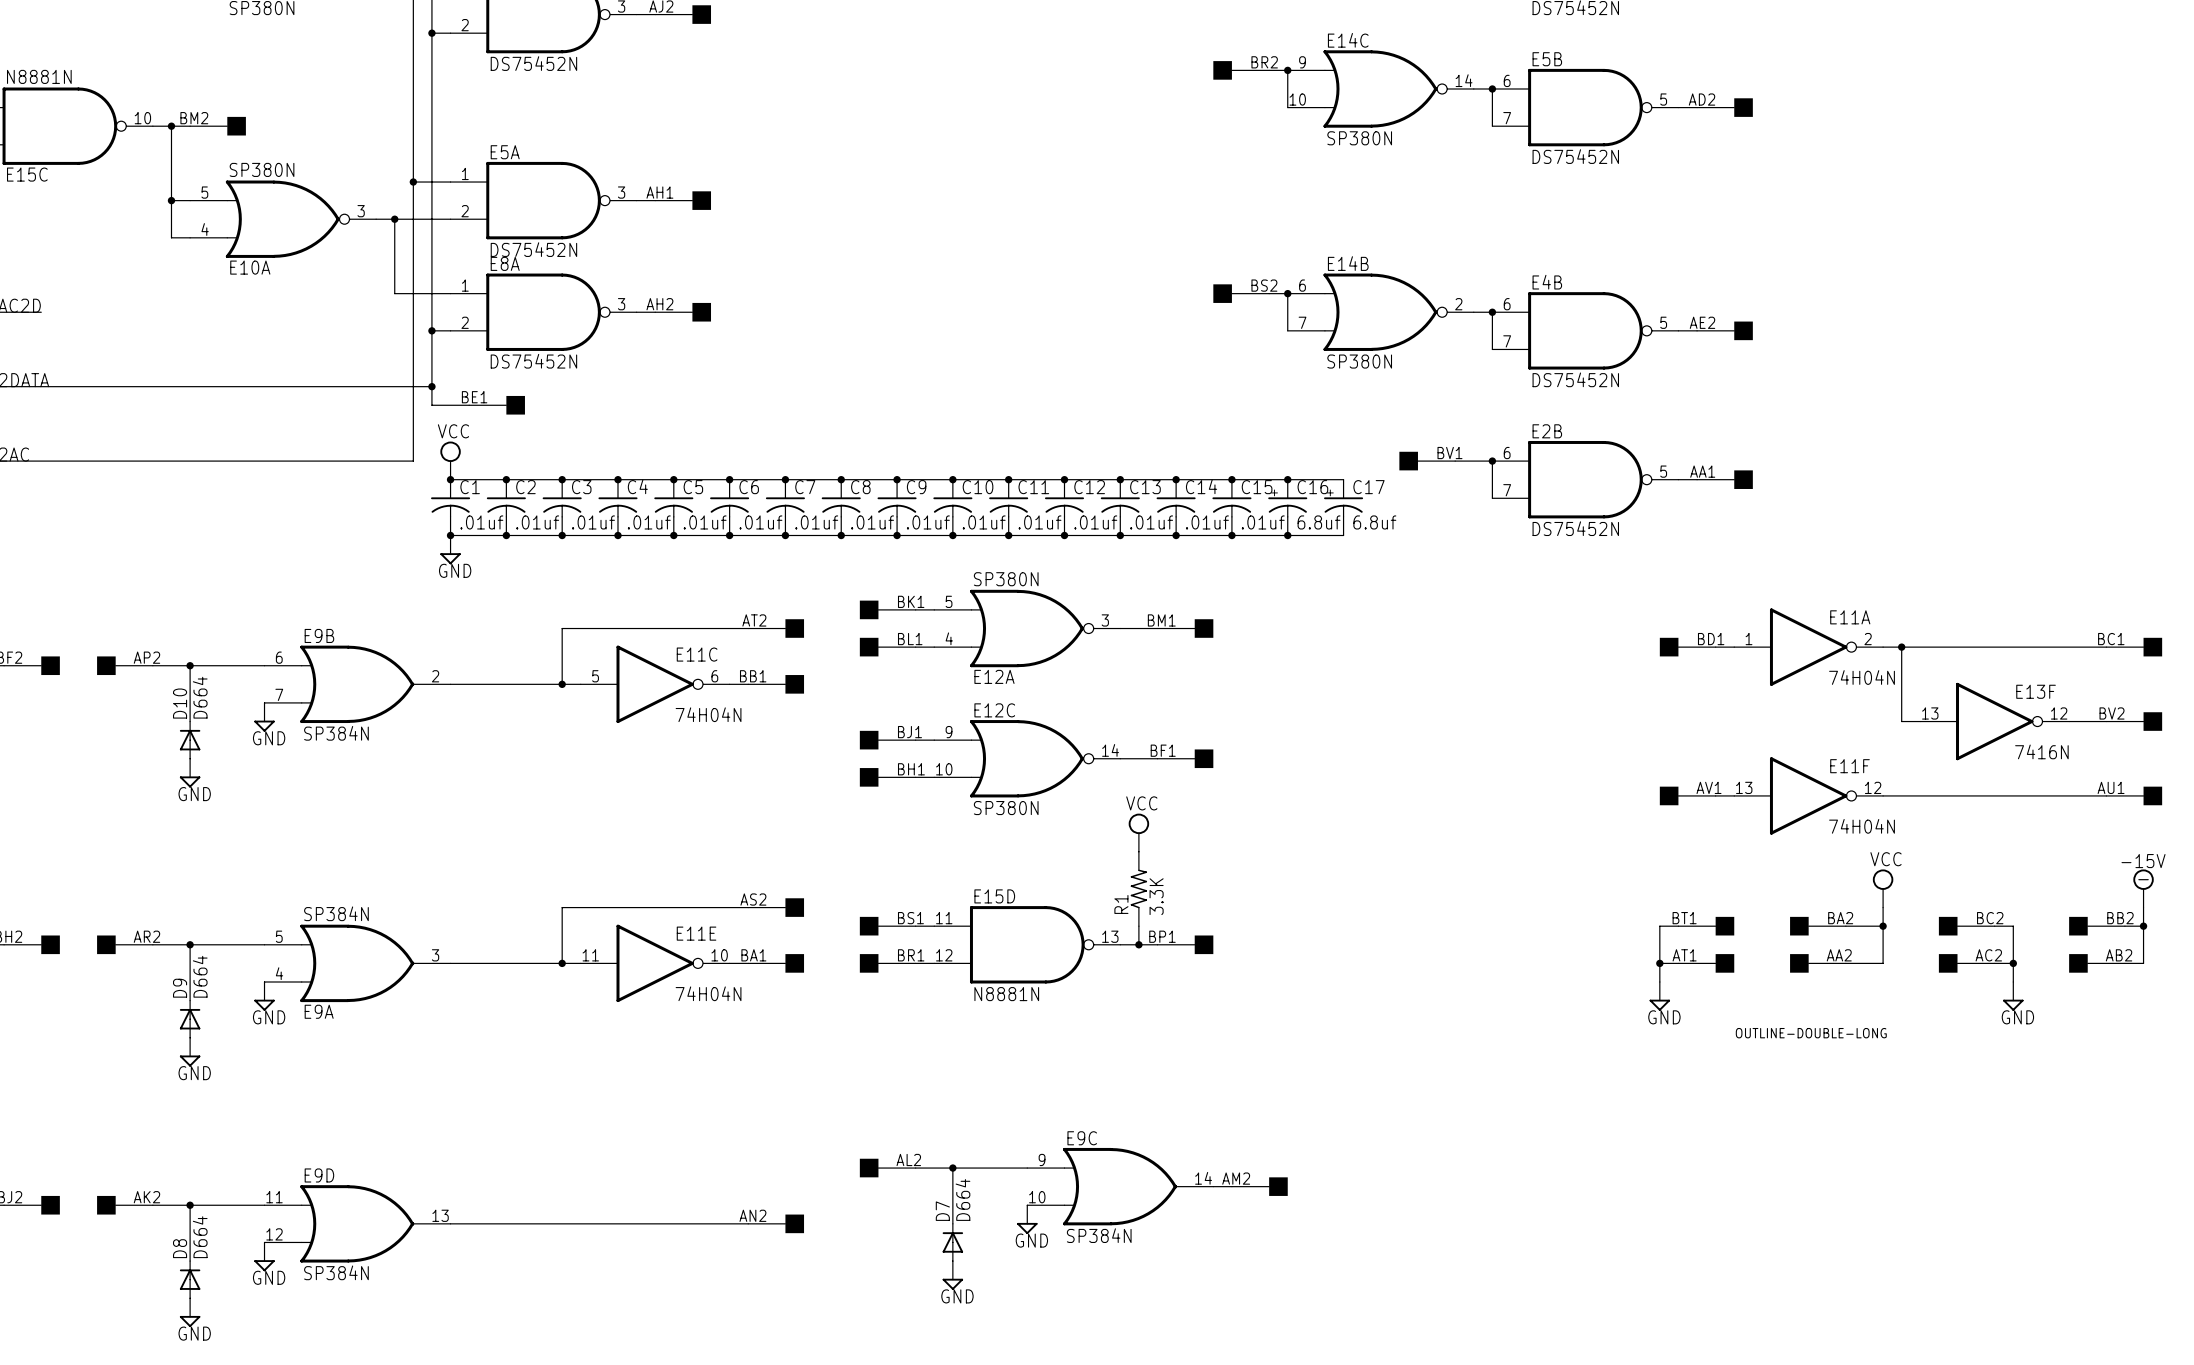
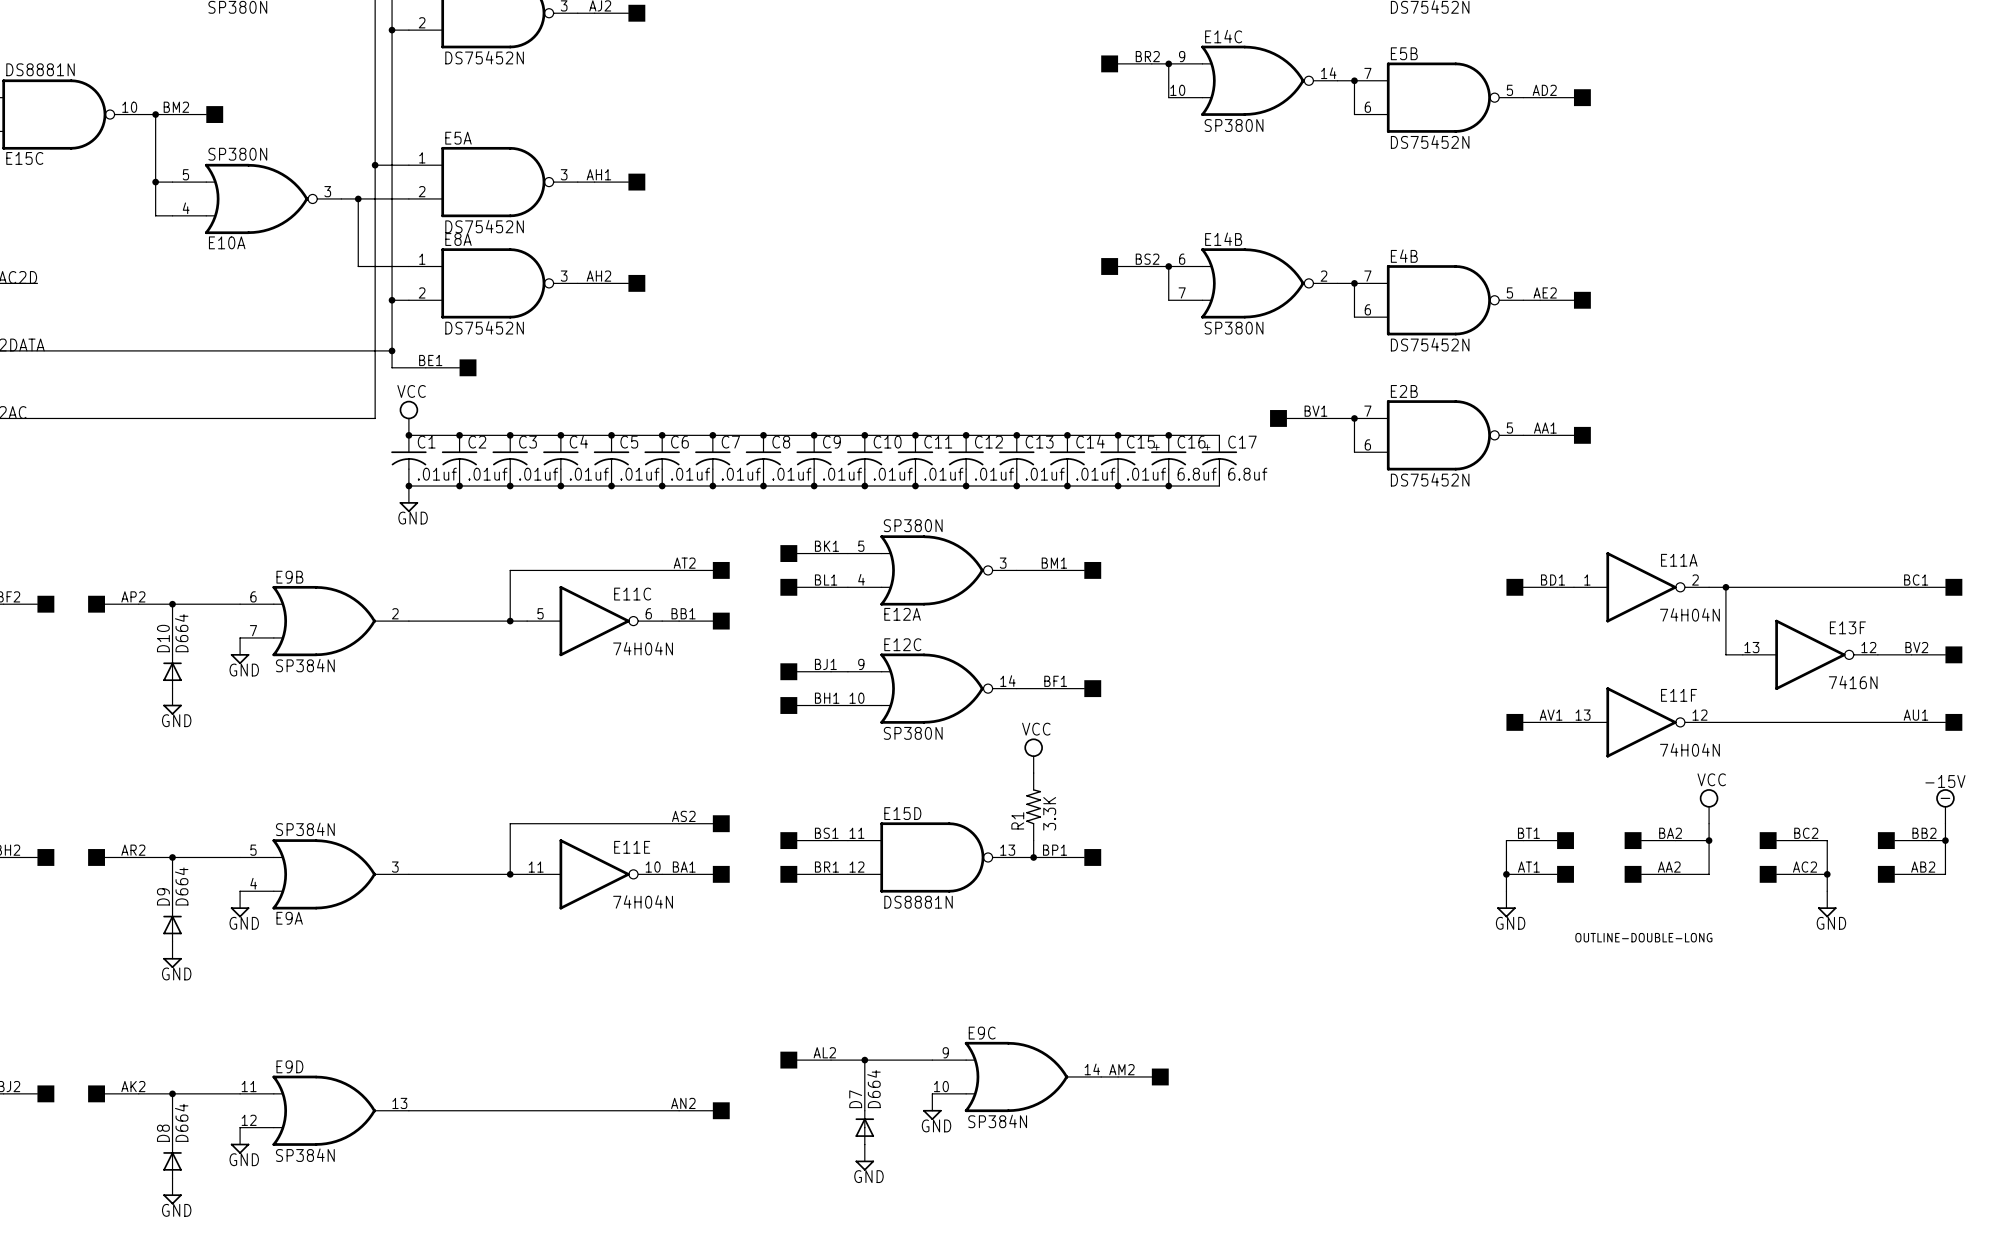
E15C value: N8881N (39, 76) -> DS8881N (40, 69)
E5B flip: as is (1585, 107) -> up-down (1438, 97)
E4B flip: as is (1585, 330) -> up-down (1438, 300)
E2B flip: as is (1585, 479) -> up-down (1438, 435)
E15D value: N8881N (1006, 994) -> DS8881N (918, 902)

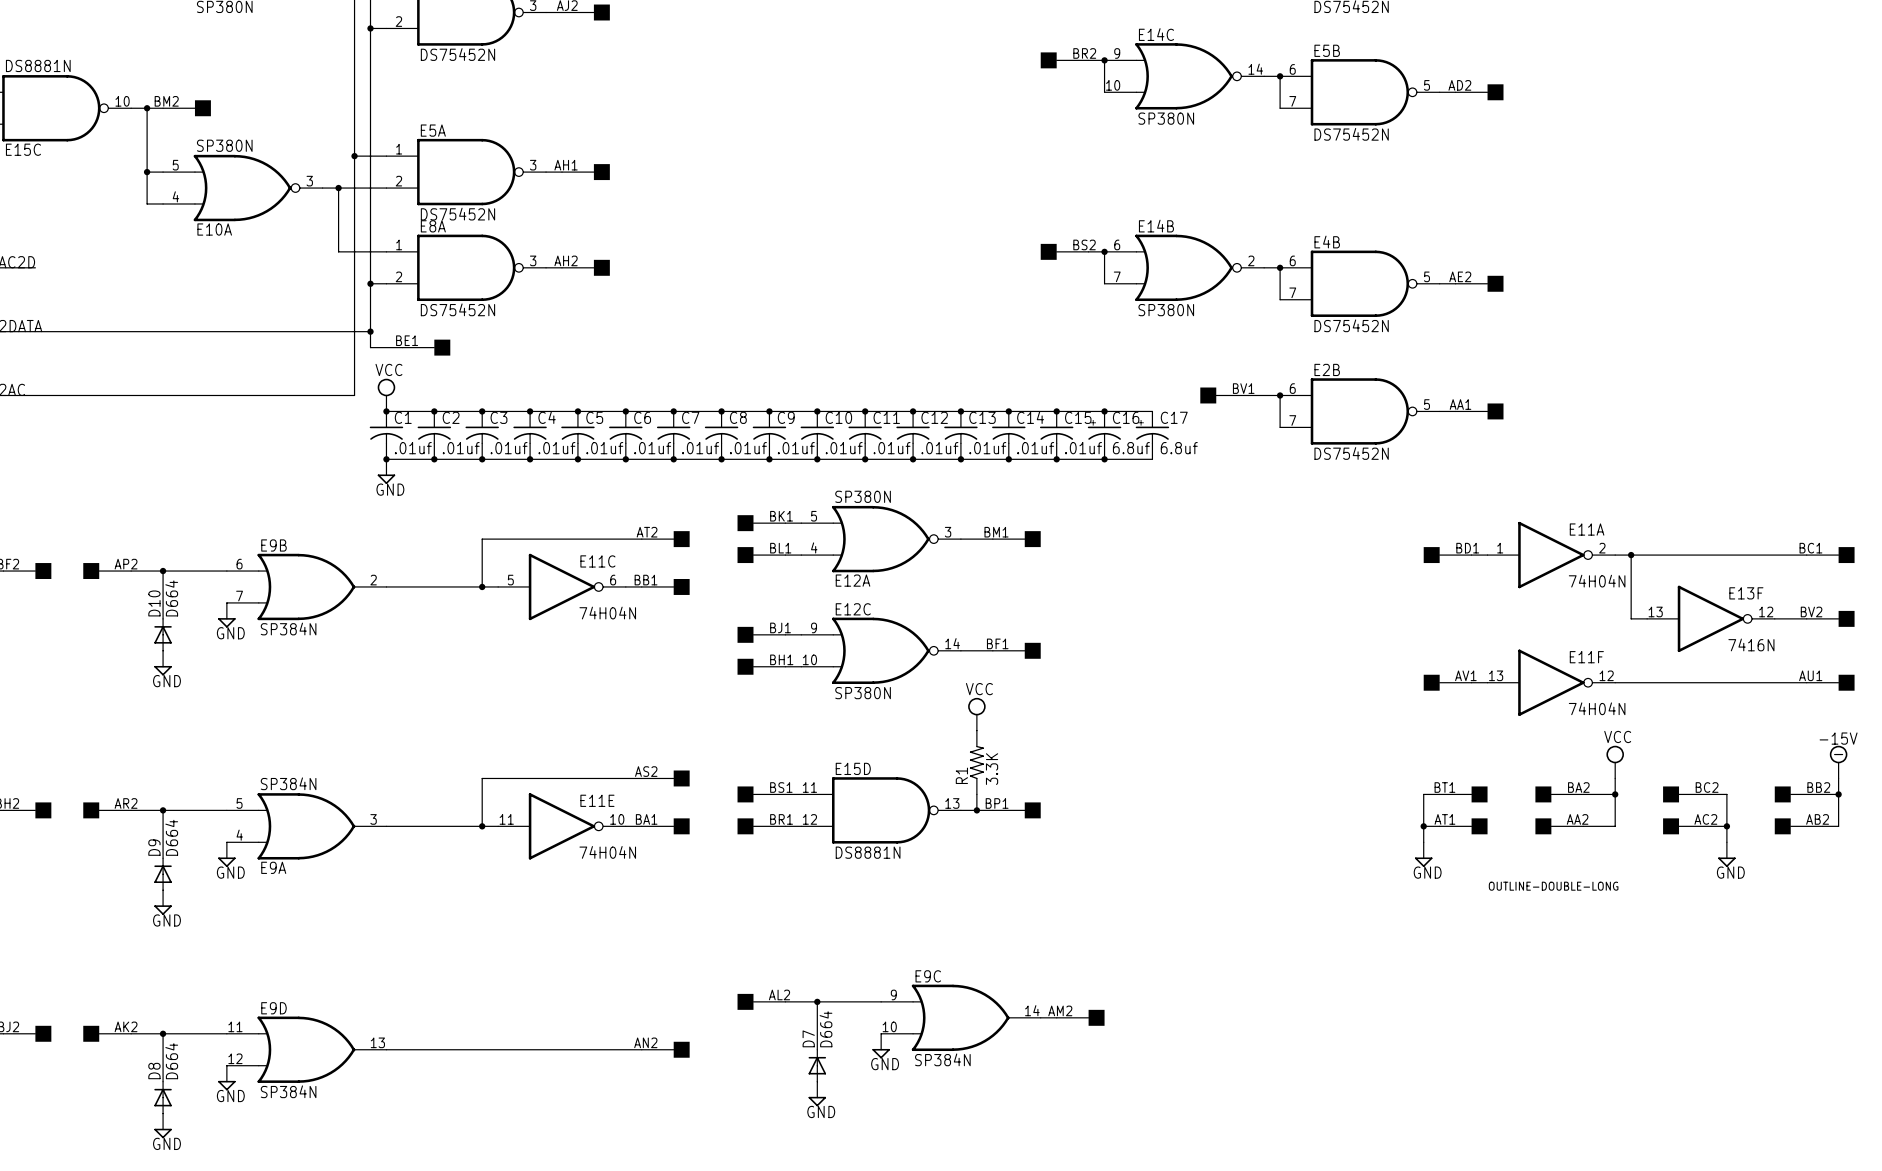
E5B flip: as is (1438, 97) -> up-down (1359, 92)
E4B flip: as is (1438, 300) -> up-down (1359, 283)
E2B flip: as is (1438, 435) -> up-down (1359, 411)

